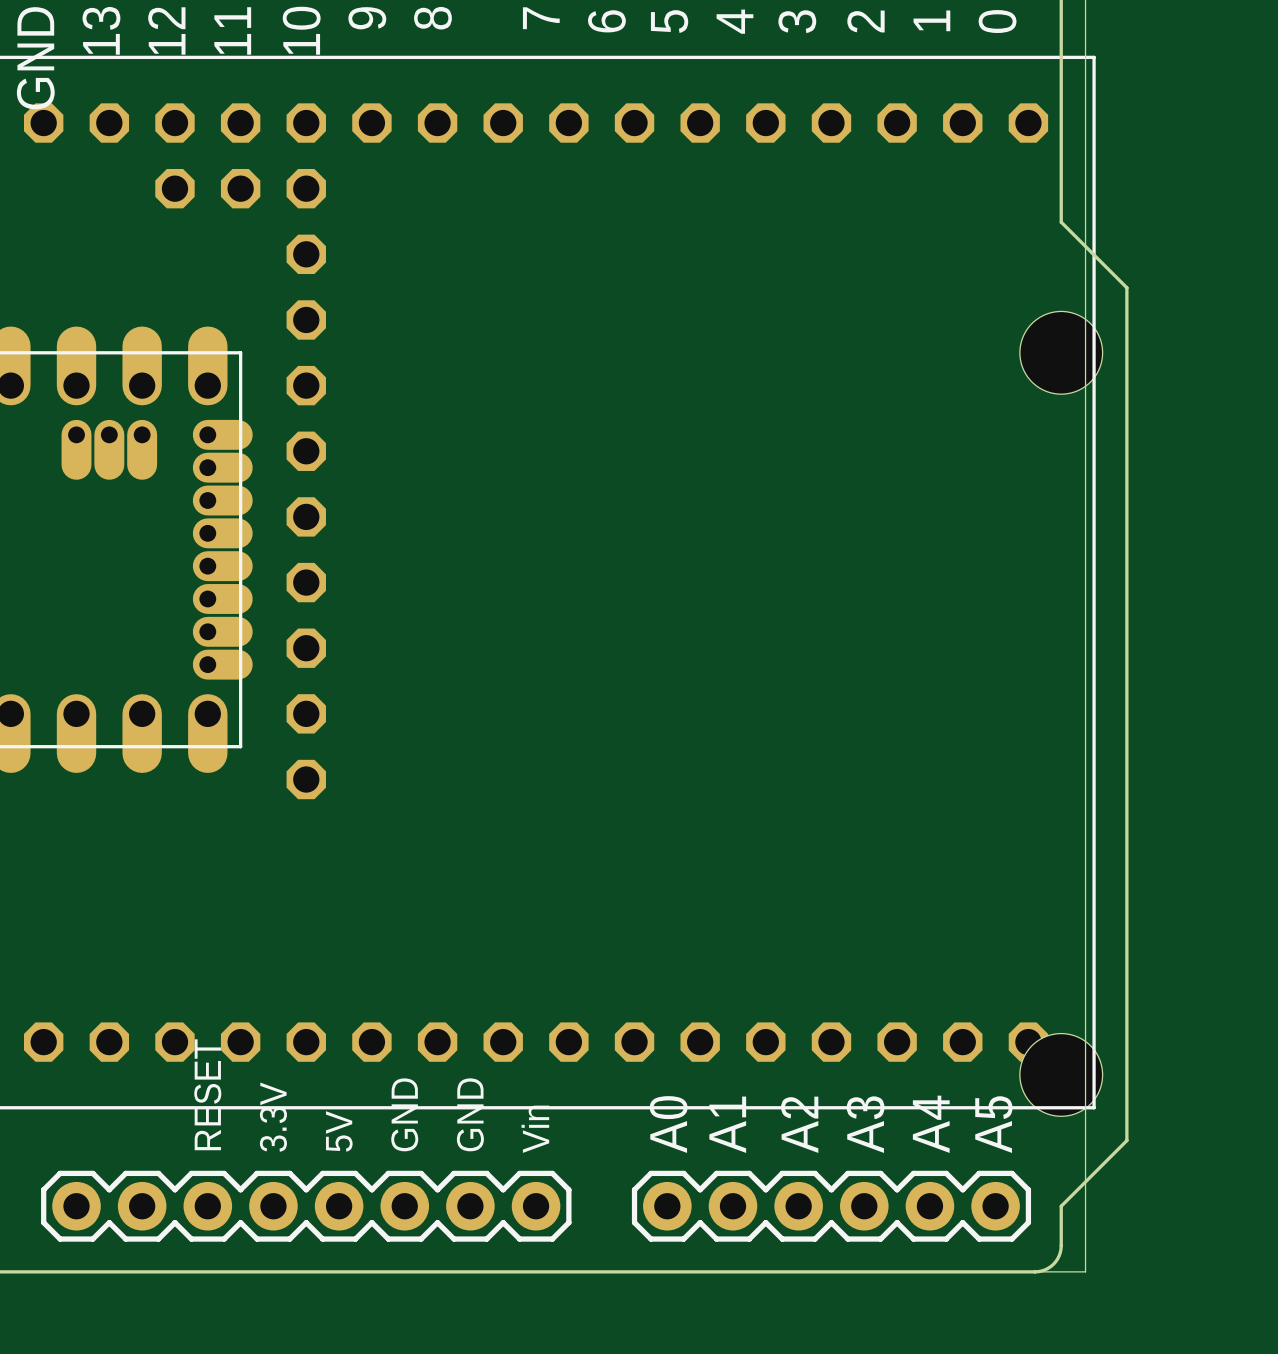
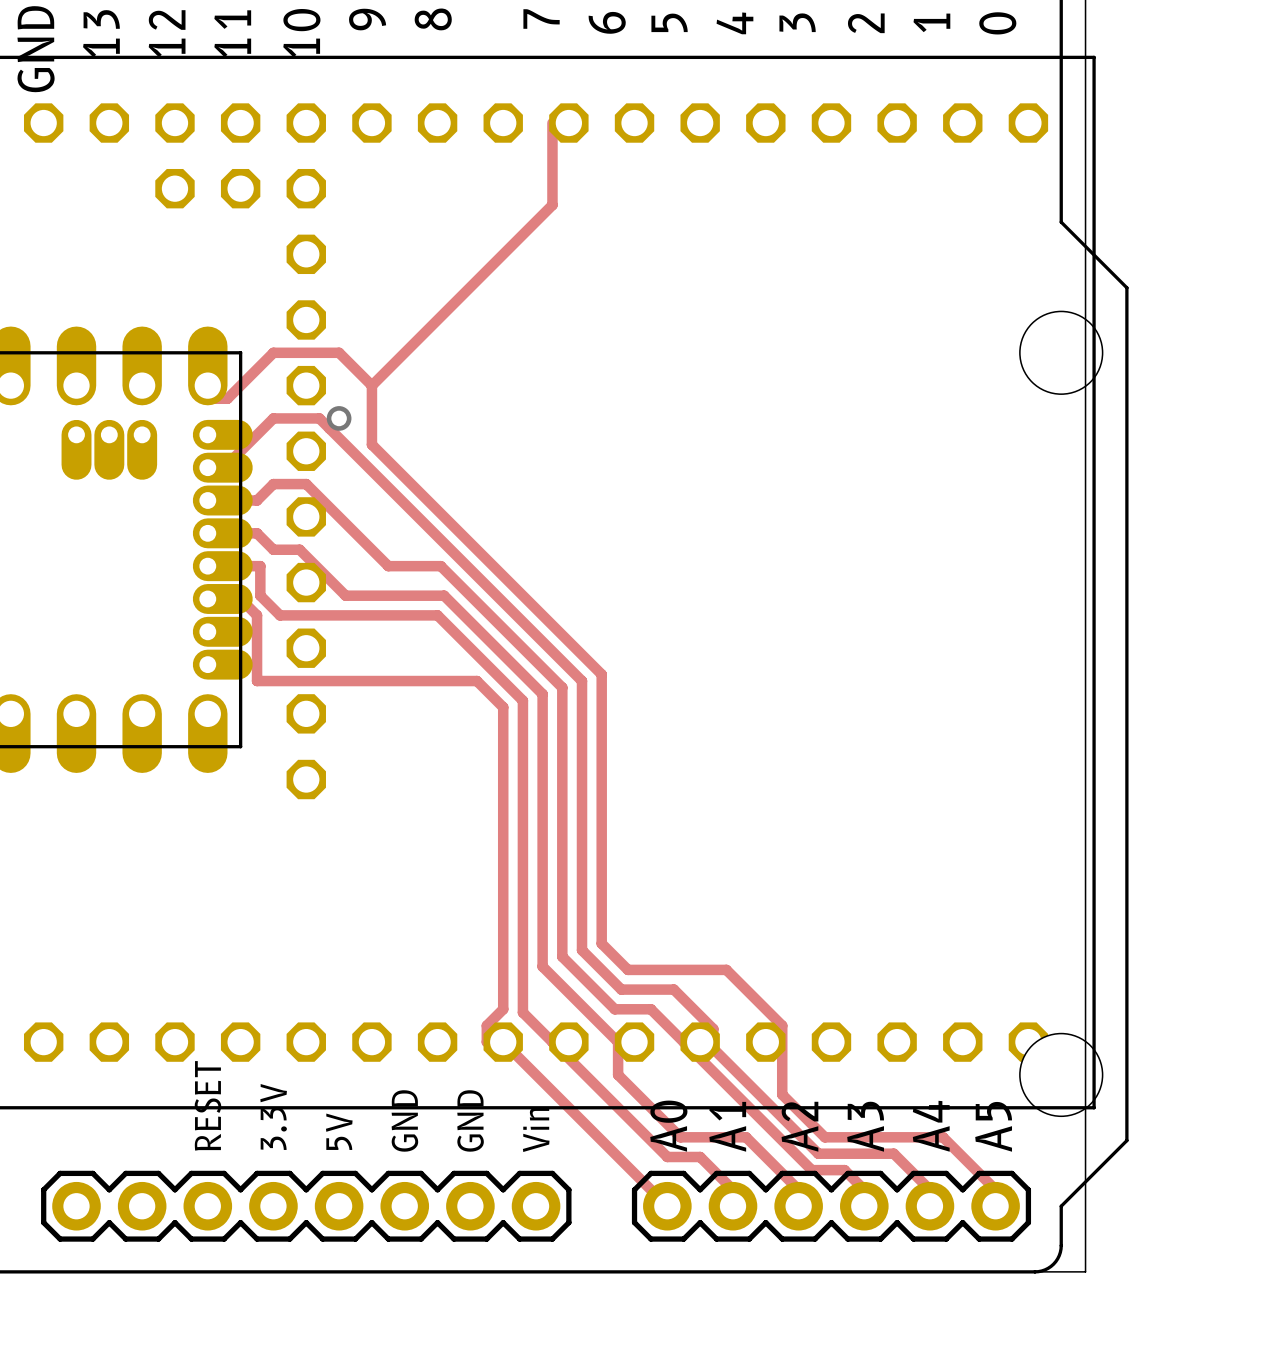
track: none -> (552, 123) (552, 205) (371, 385)
track: none -> (371, 385) (339, 352) (273, 352) (227, 398) (207, 398)
track: none -> (371, 385) (371, 444) (601, 674) (601, 943) (627, 969) (726, 969) (782, 1025) (782, 1094) (824, 1137) (943, 1137) (1012, 1206)
via: none -> (339, 418)
track: none -> (220, 467) (224, 467) (273, 418) (319, 418) (582, 681) (582, 950) (621, 989) (673, 989) (713, 1028) (713, 1048) (818, 1153) (893, 1153) (946, 1206)
track: none -> (220, 500) (257, 500) (273, 484) (306, 484) (388, 566) (440, 566) (562, 687) (562, 956) (614, 1009) (650, 1009) (811, 1170) (844, 1170) (880, 1206)
track: none -> (220, 533) (257, 533) (273, 549) (299, 549) (345, 595) (444, 595) (542, 694) (542, 966) (618, 1042) (618, 1074) (680, 1137) (746, 1137) (815, 1206)
track: none -> (220, 566) (260, 566) (260, 595) (280, 615) (437, 615) (522, 700) (522, 1012) (667, 1156) (700, 1156) (749, 1206)
track: none -> (220, 598) (243, 602) (257, 615) (257, 681) (476, 681) (503, 707) (503, 1009) (486, 1025) (486, 1042) (503, 1042) (667, 1206) (683, 1206)

